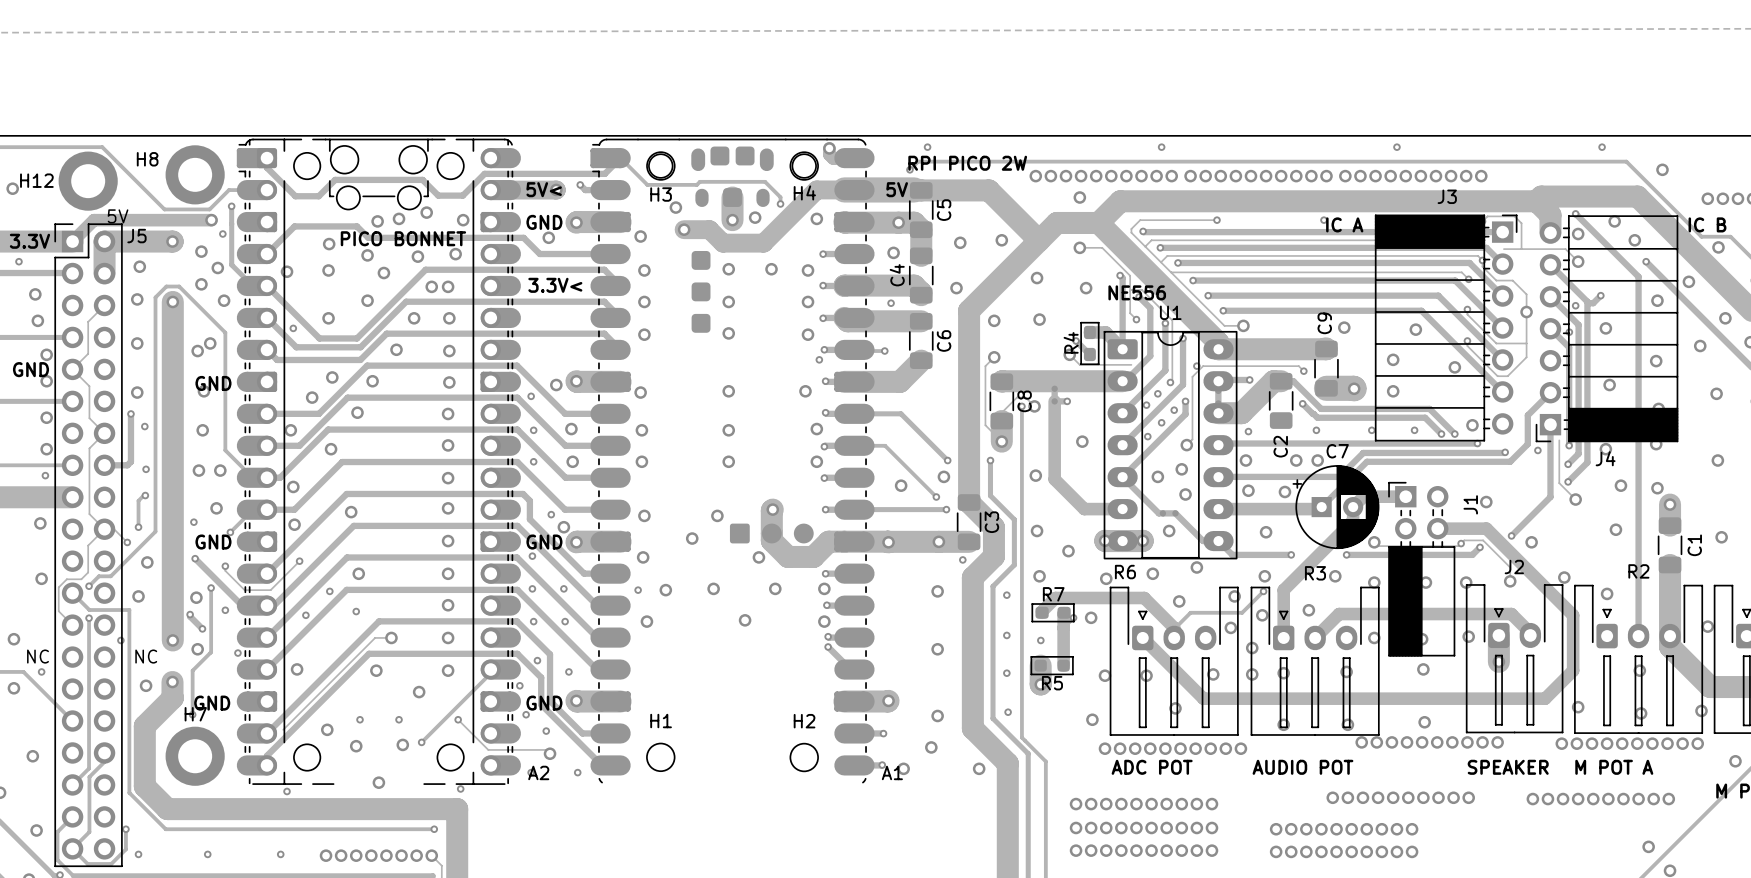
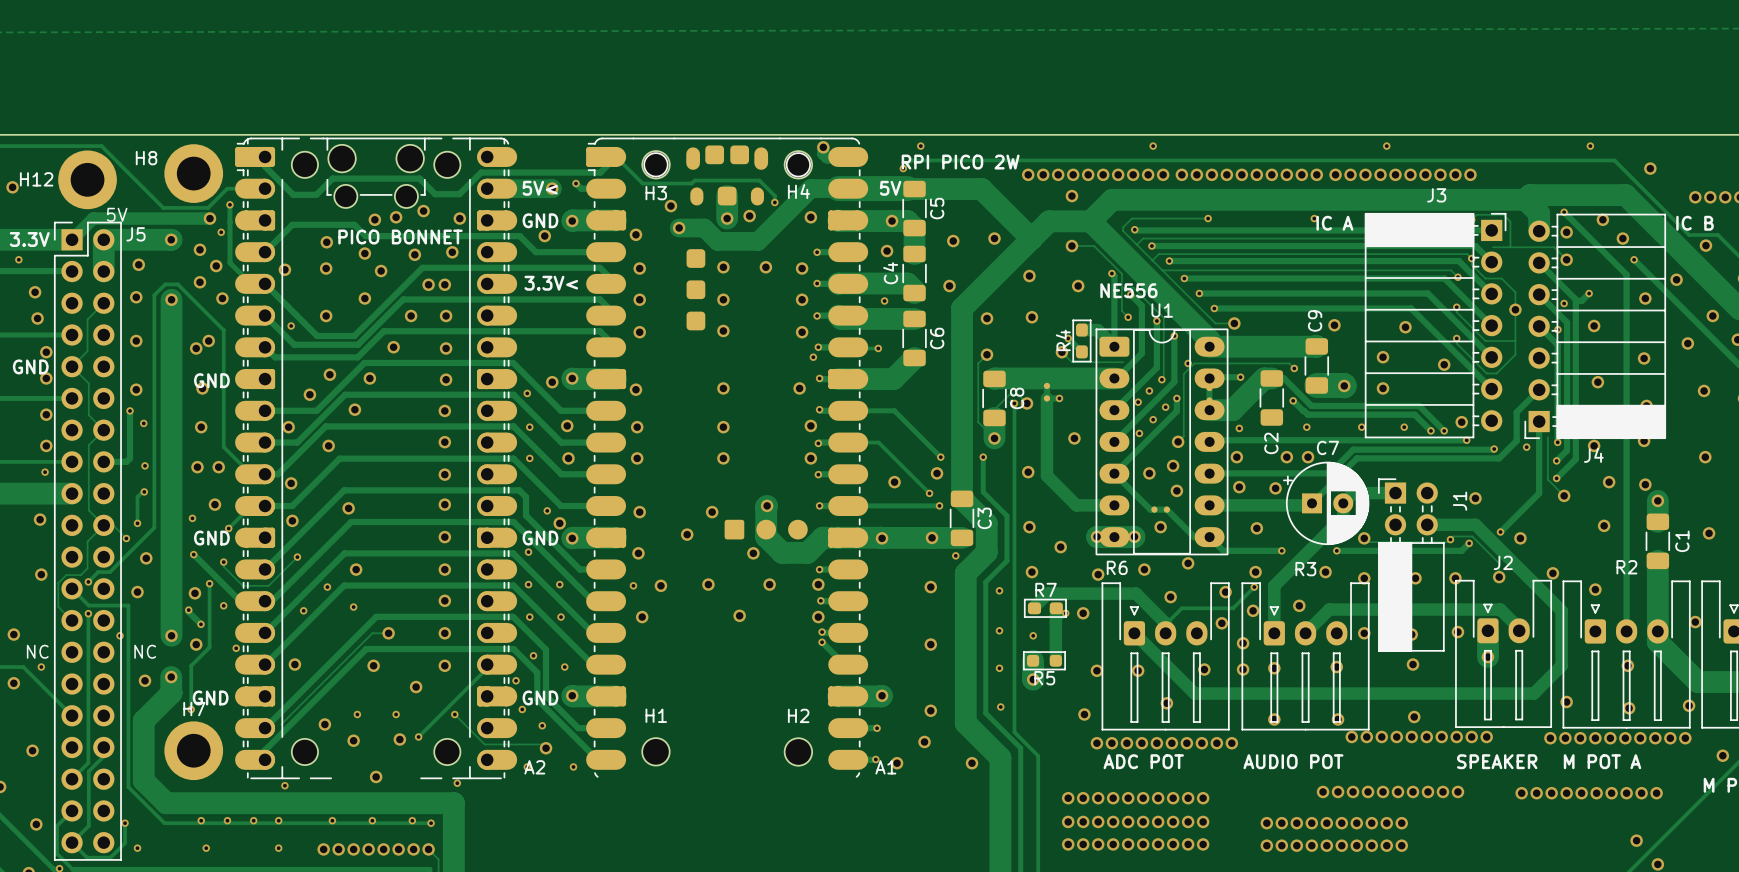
via: none -> (201, 820)
via: none -> (227, 820)
via: none -> (253, 820)
via: none -> (278, 820)
via: none -> (332, 820)
via: none -> (372, 820)
via: none -> (412, 820)

